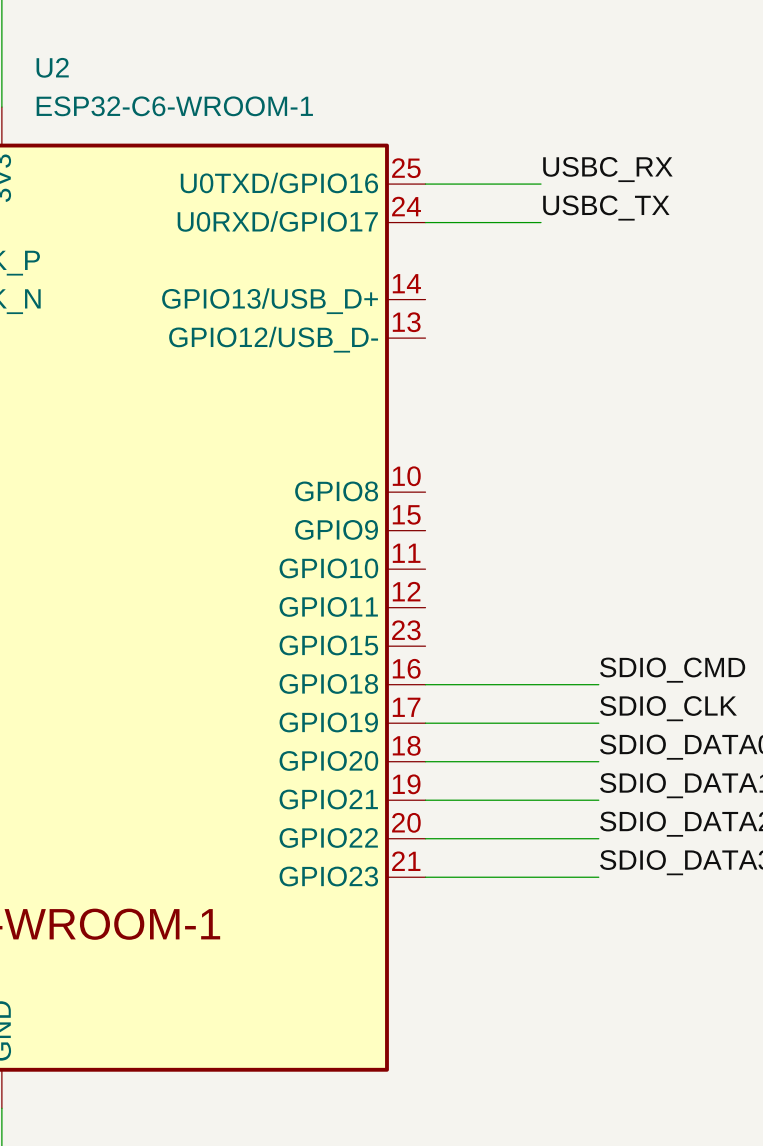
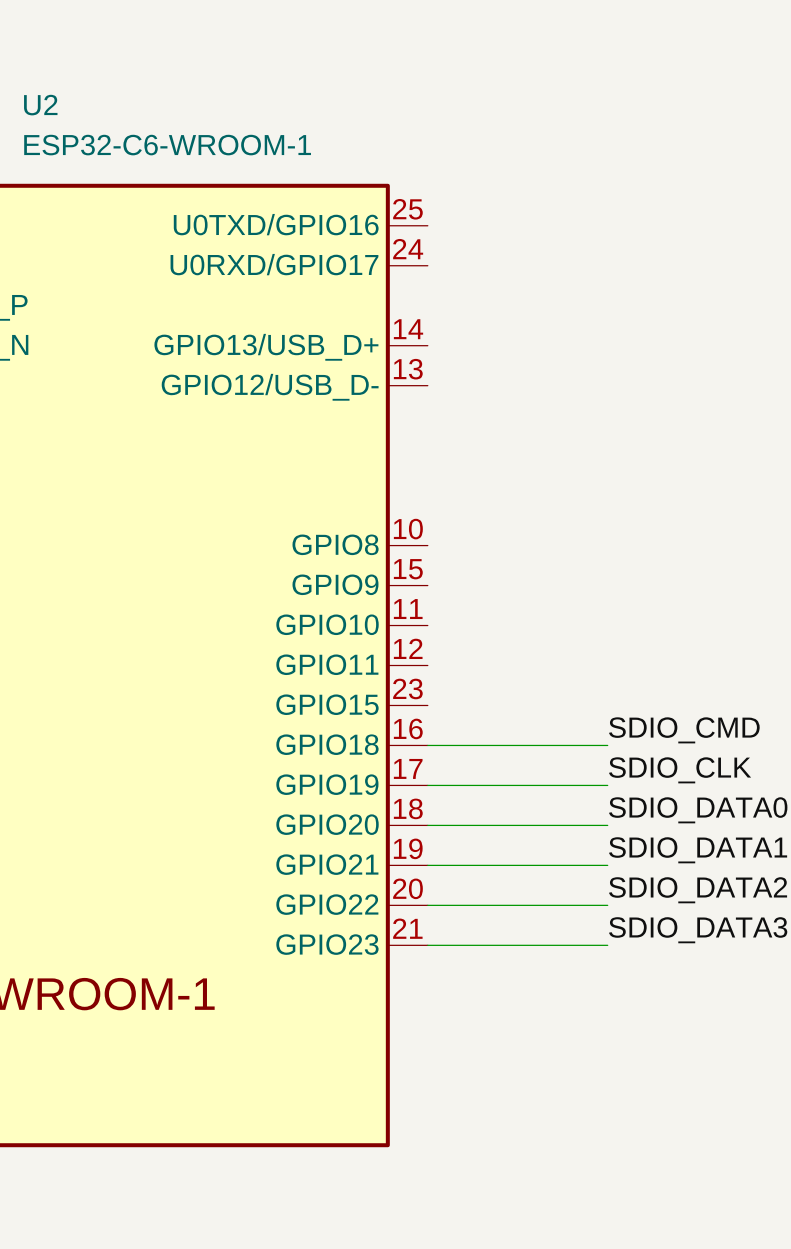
label: USBC_RX (607, 169) -> none
wire: (425, 184) (541, 184) -> none
label: USBC_TX (606, 208) -> none
wire: (425, 222) (541, 222) -> none

